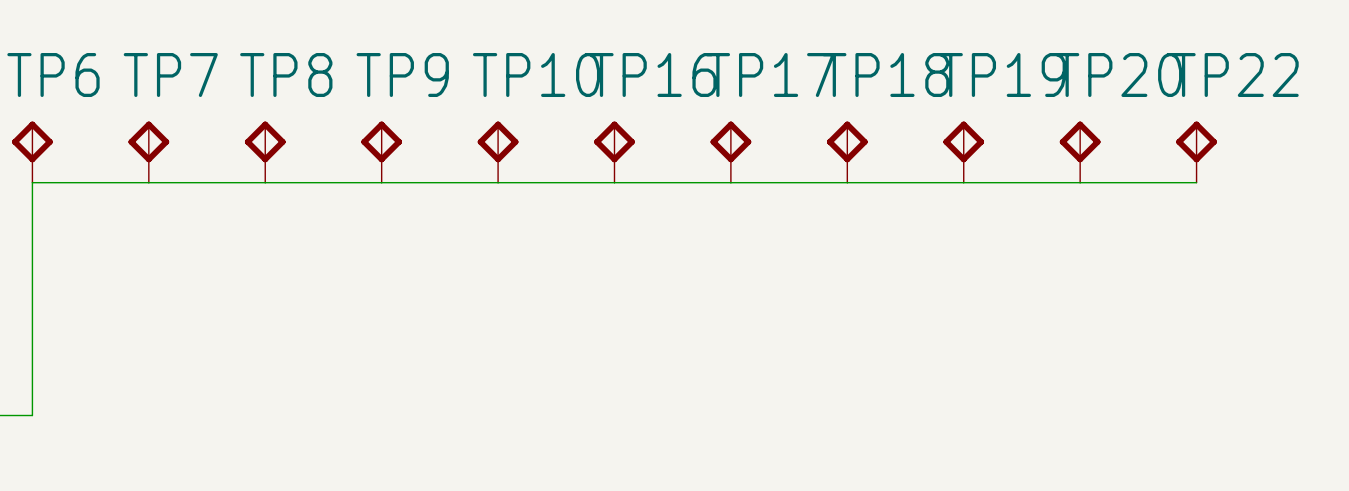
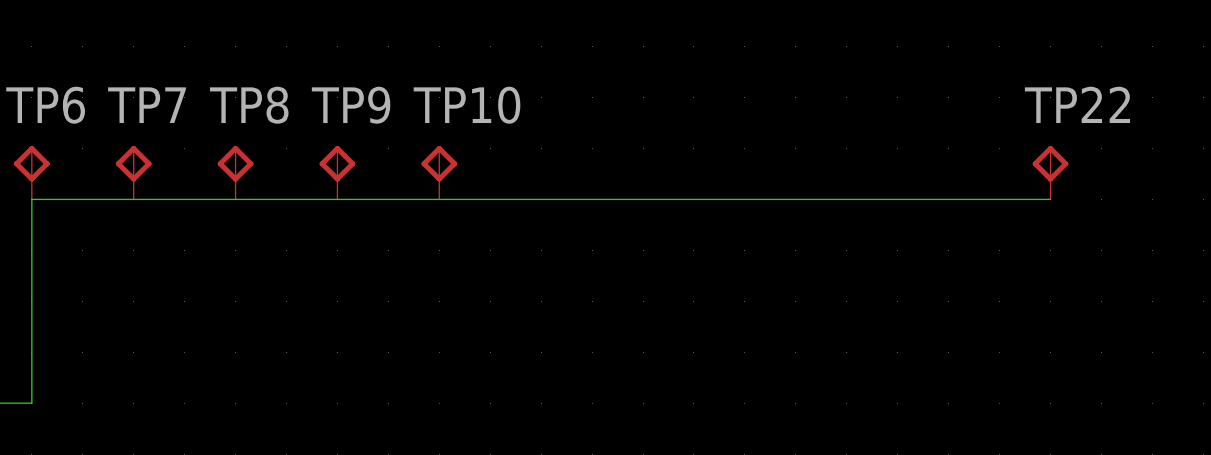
TP16: (614, 152) -> none
TP17: (730, 152) -> none
TP18: (847, 152) -> none
TP19: (963, 152) -> none
TP20: (1080, 152) -> none

